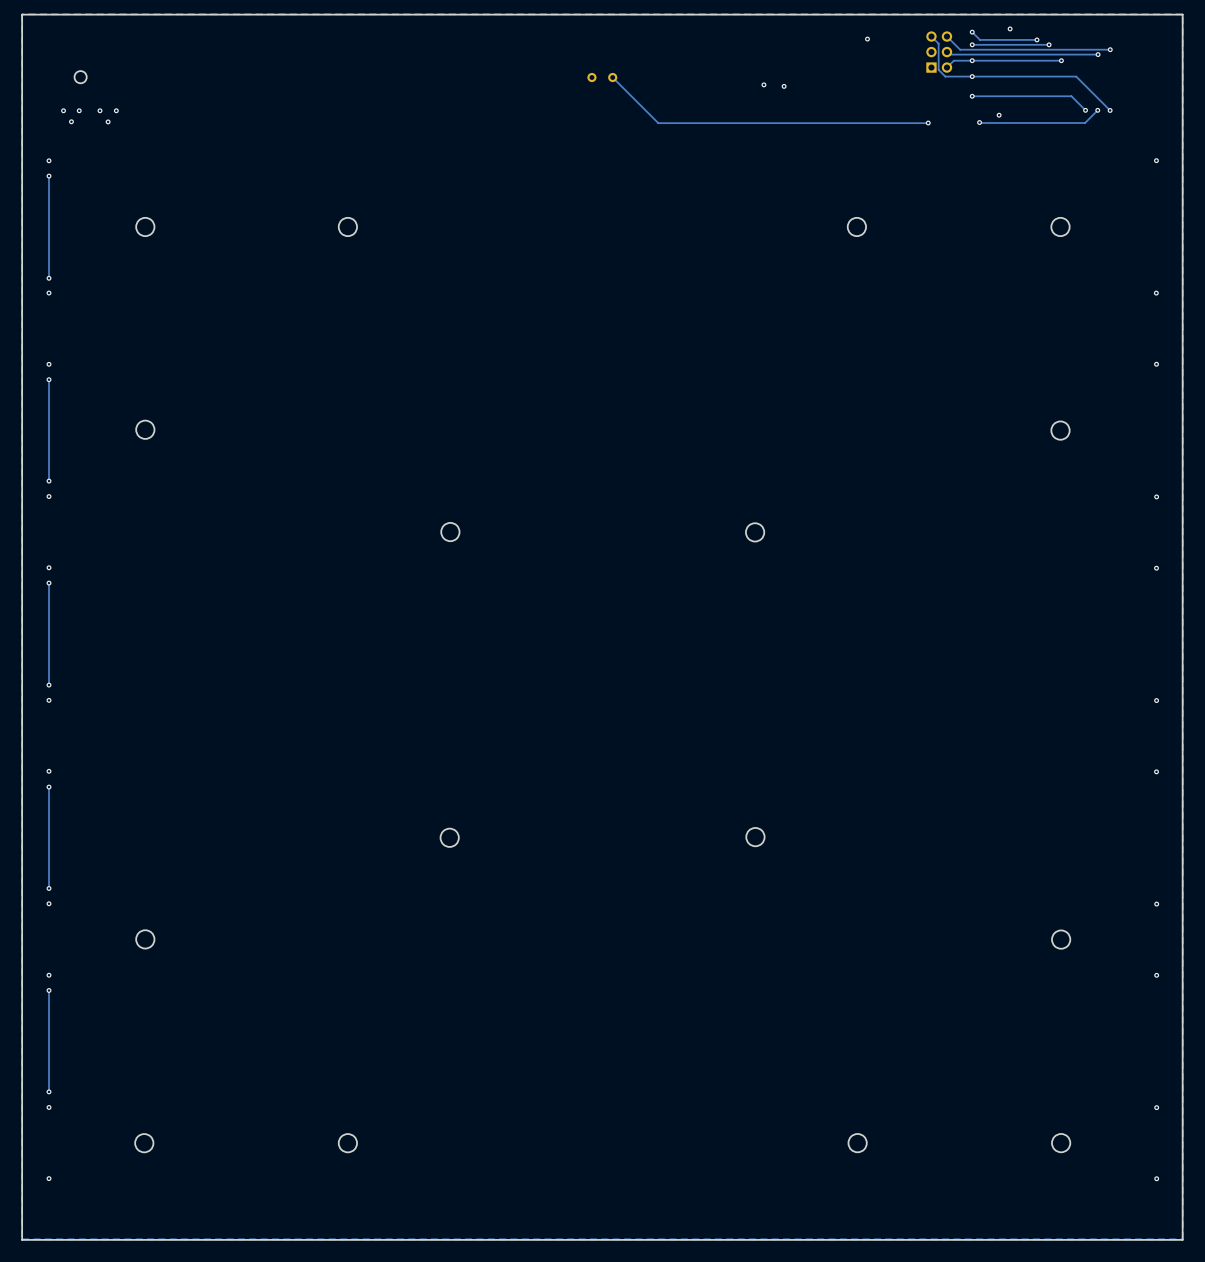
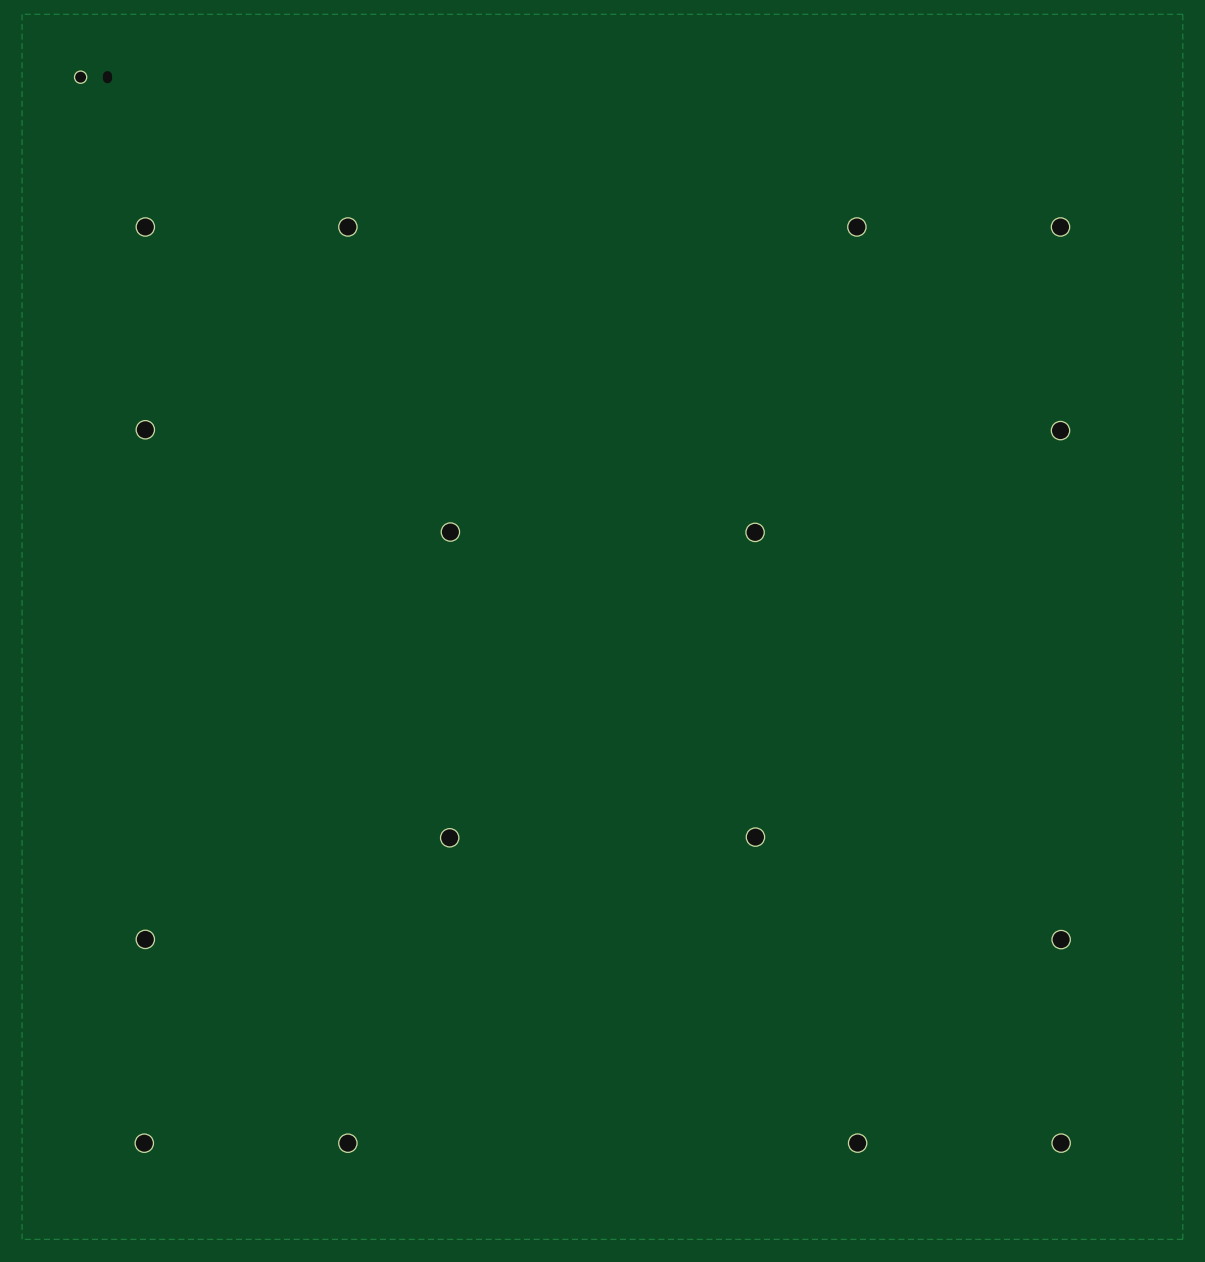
board edge: (1182, 14) (22, 14) (22, 1239) (1182, 1239) (1182, 14) -> none
via: (1010, 28) -> none
track: (972, 32) (980, 39) (1036, 39) -> none
via: (972, 32) -> none
track: (931, 36) (938, 43) (938, 69) (945, 76) (1076, 76) (1110, 110) -> none
track: (946, 36) (960, 49) (1110, 49) -> none
via: (867, 39) -> none
via: (1036, 39) -> none
via: (972, 44) -> none
track: (1049, 44) (972, 44) -> none
via: (1049, 44) -> none
via: (1110, 49) -> none
part: (939, 52) -> none
track: (946, 52) (949, 54) (1098, 54) -> none
via: (1098, 54) -> none
via: (972, 60) -> none
track: (1061, 60) (953, 60) (946, 67) -> none
via: (1061, 60) -> none
via: (972, 76) -> none
part: (602, 77) -> none
track: (612, 77) (658, 123) (928, 123) -> none
via: (763, 84) -> none
via: (784, 86) -> none
track: (972, 96) (1071, 96) (1085, 110) -> none
via: (972, 96) -> none
via: (63, 110) -> none
via: (79, 110) -> none
via: (100, 110) -> none
via: (116, 110) -> none
via: (1085, 110) -> none
track: (1097, 110) (1085, 122) (979, 122) -> none
via: (1097, 110) -> none
via: (1110, 110) -> none
via: (999, 115) -> none
via: (71, 121) -> none
via: (108, 121) -> none
via: (928, 122) -> none
via: (979, 122) -> none
via: (49, 160) -> none
via: (1156, 160) -> none
track: (49, 176) (49, 278) -> none
via: (49, 176) -> none
via: (49, 278) -> none
via: (49, 293) -> none
via: (1156, 293) -> none
via: (49, 364) -> none
via: (1156, 364) -> none
track: (49, 379) (49, 481) -> none
via: (49, 379) -> none
via: (49, 481) -> none
via: (49, 496) -> none
via: (1156, 496) -> none
via: (49, 567) -> none
via: (1156, 568) -> none
track: (49, 583) (49, 685) -> none
via: (49, 583) -> none
via: (49, 685) -> none
via: (49, 700) -> none
via: (1156, 700) -> none
via: (49, 771) -> none
via: (1156, 771) -> none
track: (49, 787) (49, 888) -> none
via: (49, 787) -> none
via: (49, 888) -> none
via: (49, 903) -> none
via: (1156, 904) -> none
via: (49, 975) -> none
via: (1156, 975) -> none
track: (49, 990) (49, 1091) -> none
via: (49, 990) -> none
via: (49, 1091) -> none
via: (49, 1107) -> none
via: (1156, 1107) -> none
via: (49, 1178) -> none
via: (1156, 1178) -> none

